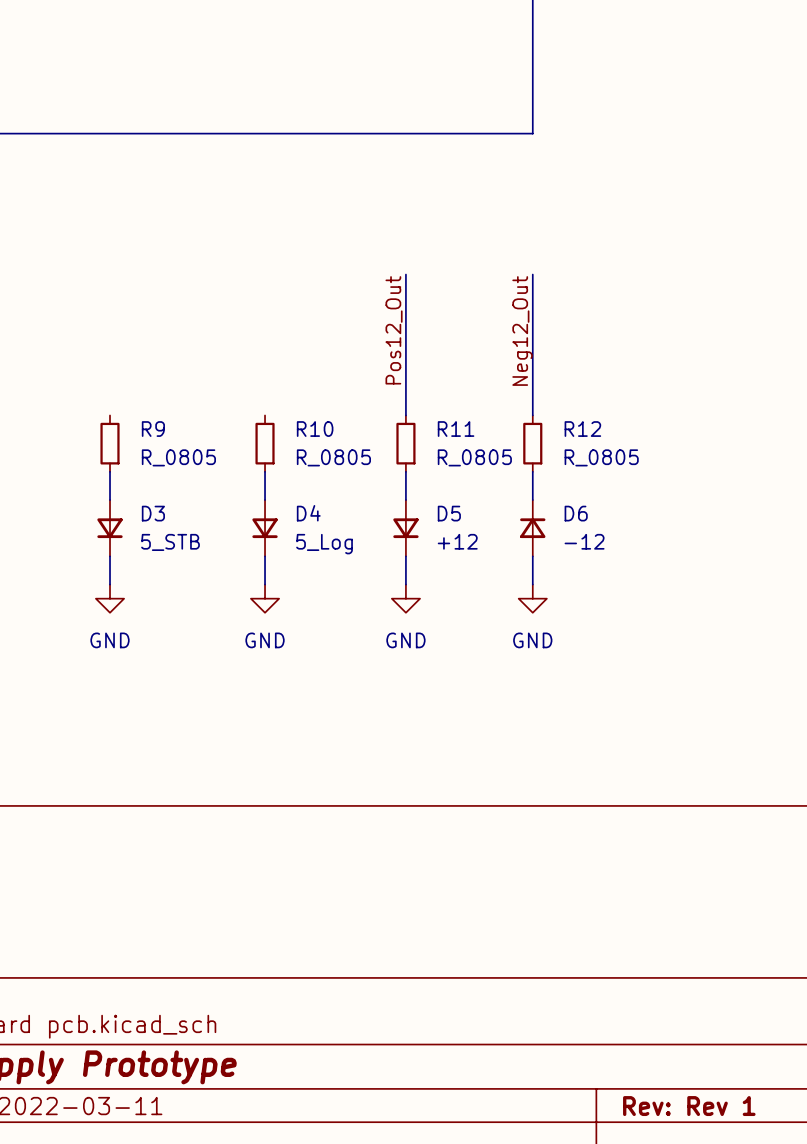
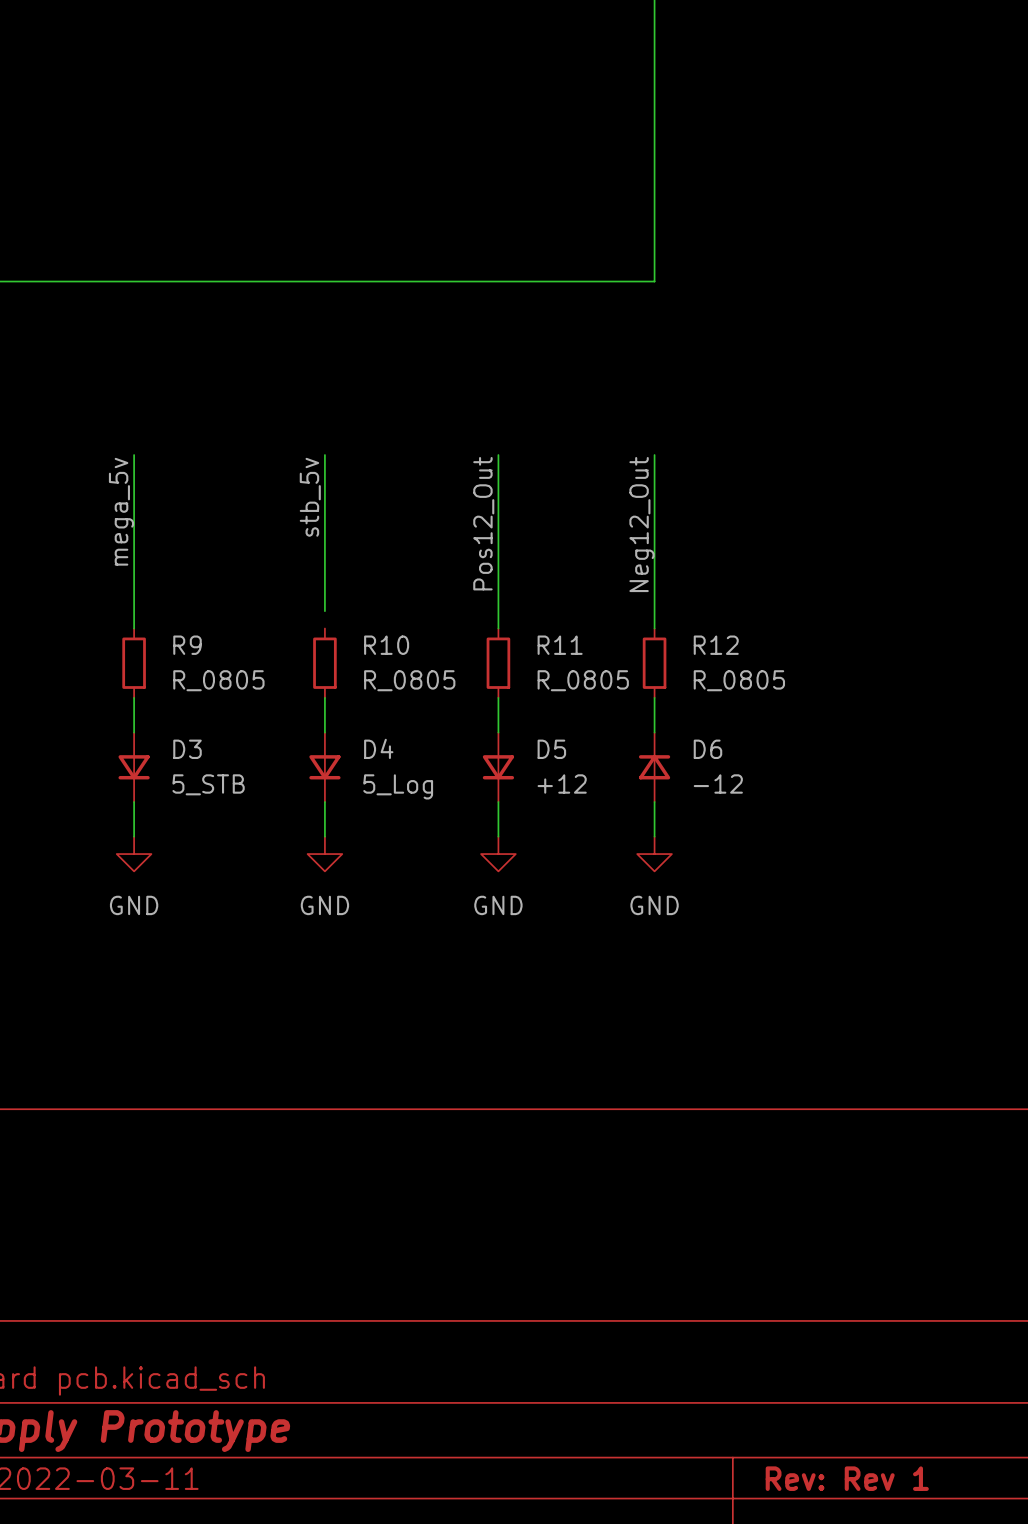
wire: none -> (134, 455) (134, 628)
wire: none -> (324, 455) (324, 611)
label: none -> stb_5v (310, 497)
label: none -> mega_5v (121, 511)

